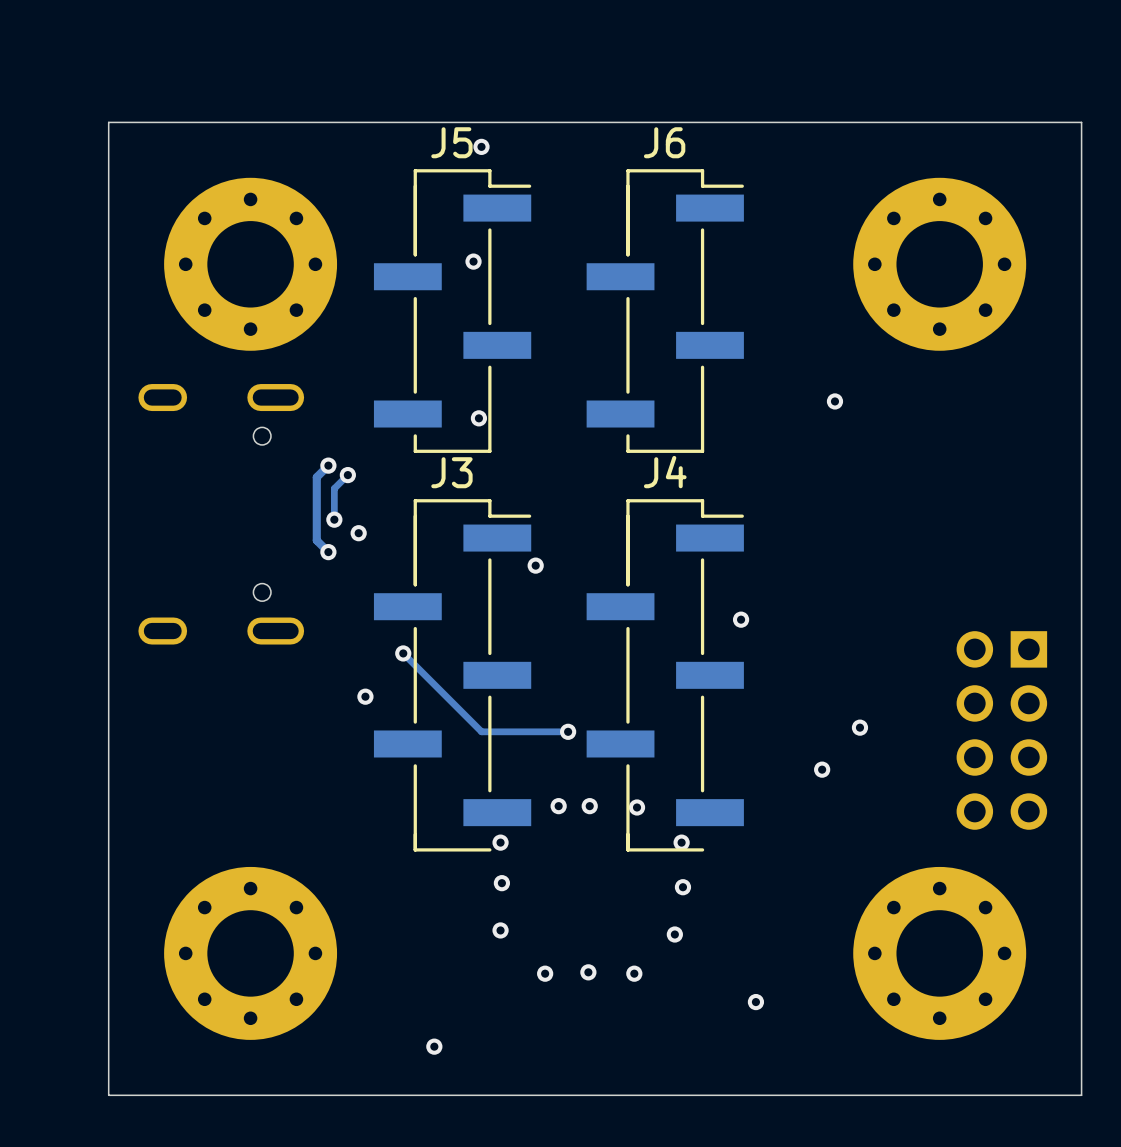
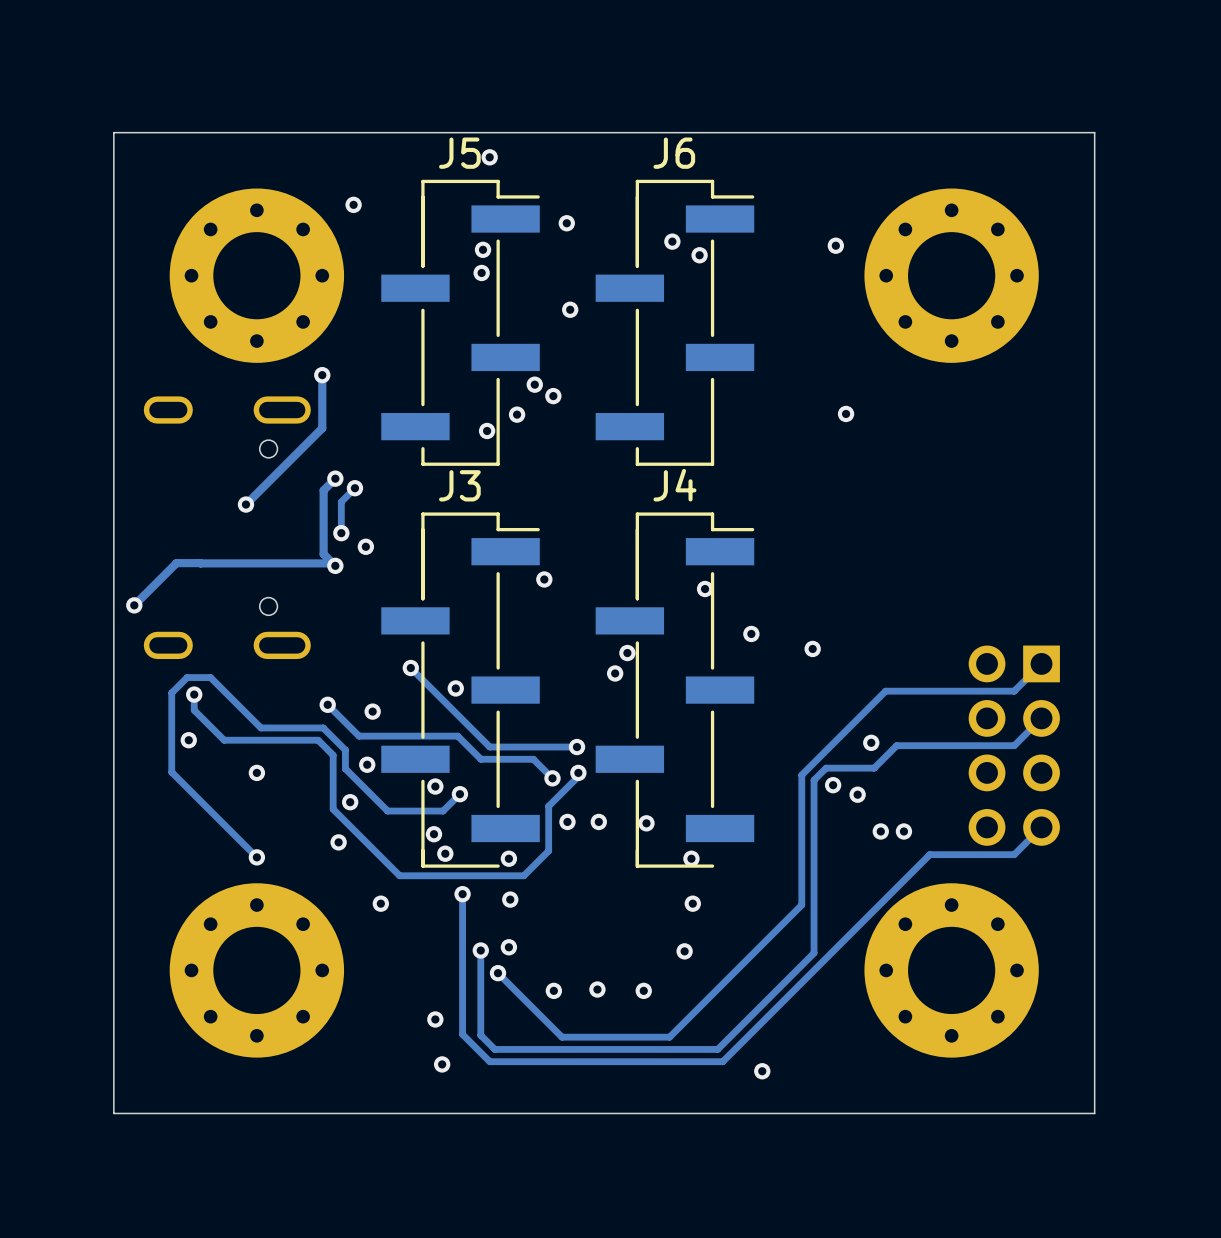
via: none -> (353, 204)
via: none -> (566, 223)
via: none -> (672, 241)
via: none -> (835, 245)
via: none -> (483, 249)
via: none -> (699, 255)
via: none -> (570, 309)
track: none -> (322, 375) (322, 428) (245, 504)
via: none -> (322, 375)
via: none -> (534, 384)
via: none -> (553, 396)
via: none -> (517, 414)
via: none -> (245, 504)
track: none -> (200, 563) (176, 563) (134, 605)
track: none -> (332, 563) (200, 563)
via: none -> (705, 589)
via: none -> (134, 605)
via: none -> (812, 648)
via: none -> (627, 653)
track: none -> (1041, 663) (1014, 691) (885, 691) (801, 775) (801, 905) (669, 1037) (562, 1037) (498, 973)
via: none -> (615, 673)
via: none -> (455, 688)
track: none -> (194, 694) (194, 710) (224, 740) (318, 740) (333, 755) (333, 809) (399, 875) (523, 875) (548, 850) (548, 806) (578, 776) (578, 772)
via: none -> (194, 694)
track: none -> (327, 704) (359, 736) (457, 736) (480, 759) (533, 759) (552, 778)
via: none -> (327, 704)
track: none -> (1041, 718) (1014, 745) (896, 745) (874, 768) (826, 768) (814, 780) (814, 953) (717, 1049) (494, 1049) (480, 1035) (480, 950)
via: none -> (188, 740)
via: none -> (367, 764)
via: none -> (256, 772)
via: none -> (578, 772)
via: none -> (552, 778)
via: none -> (435, 786)
track: none -> (459, 794) (443, 811) (387, 811) (345, 768) (345, 750) (323, 727) (260, 727) (210, 677) (187, 677) (171, 692) (171, 772) (256, 857)
via: none -> (459, 794)
via: none -> (857, 794)
via: none -> (350, 802)
track: none -> (1041, 827) (1014, 854) (929, 854) (722, 1061) (489, 1061) (462, 1034) (462, 894)
via: none -> (880, 831)
via: none -> (903, 831)
via: none -> (433, 834)
via: none -> (338, 842)
via: none -> (445, 853)
via: none -> (256, 857)
via: none -> (462, 894)
via: none -> (380, 903)
via: none -> (480, 950)
via: none -> (498, 973)
via: none -> (435, 1019)
via position: (755, 1002) -> (762, 1071)

